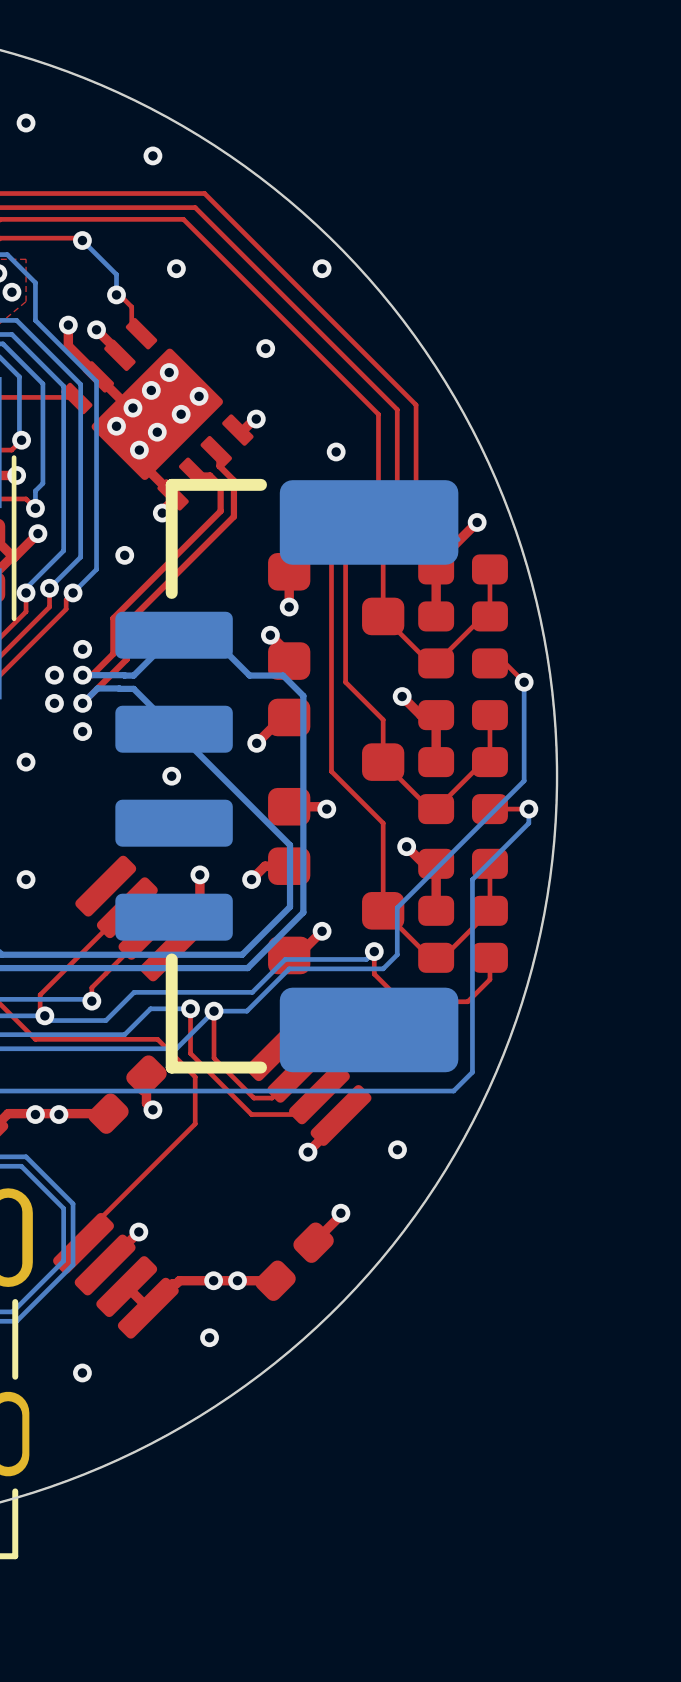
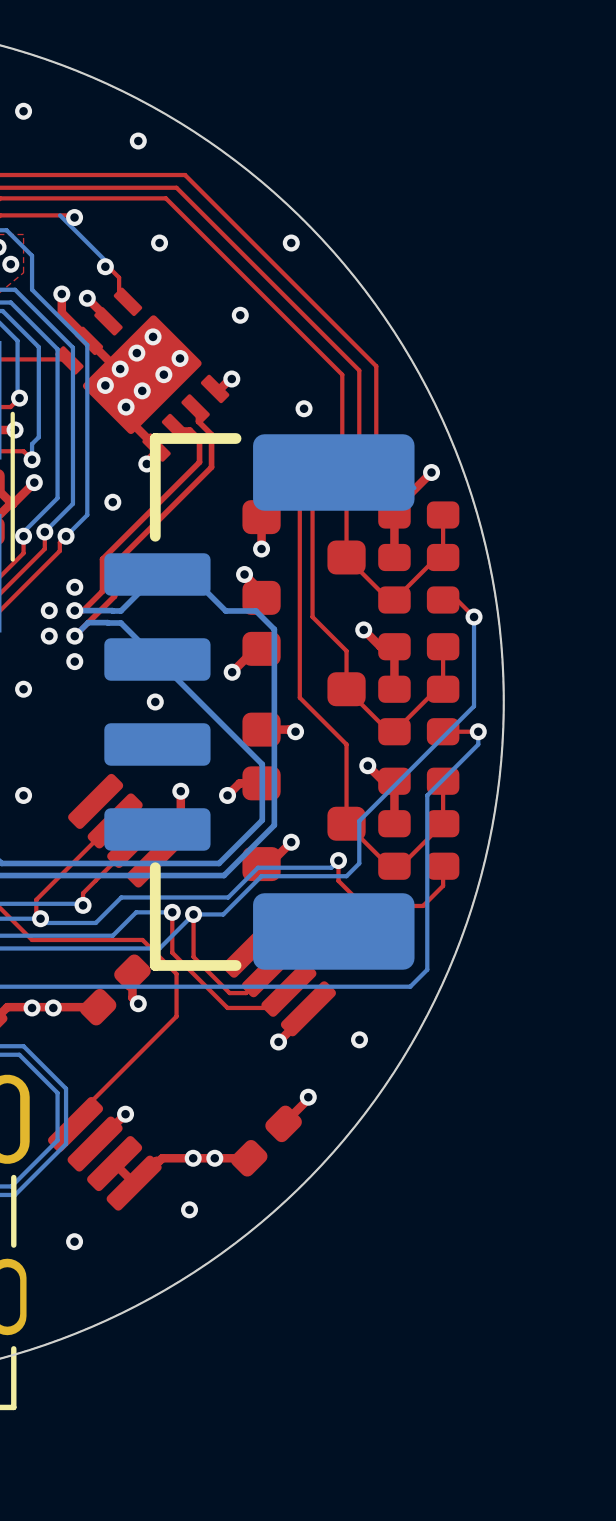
bottom track: none -> (60, 215) (107, 262) (107, 266)
bottom track: (82, 240) (116, 274) (116, 294) -> none

